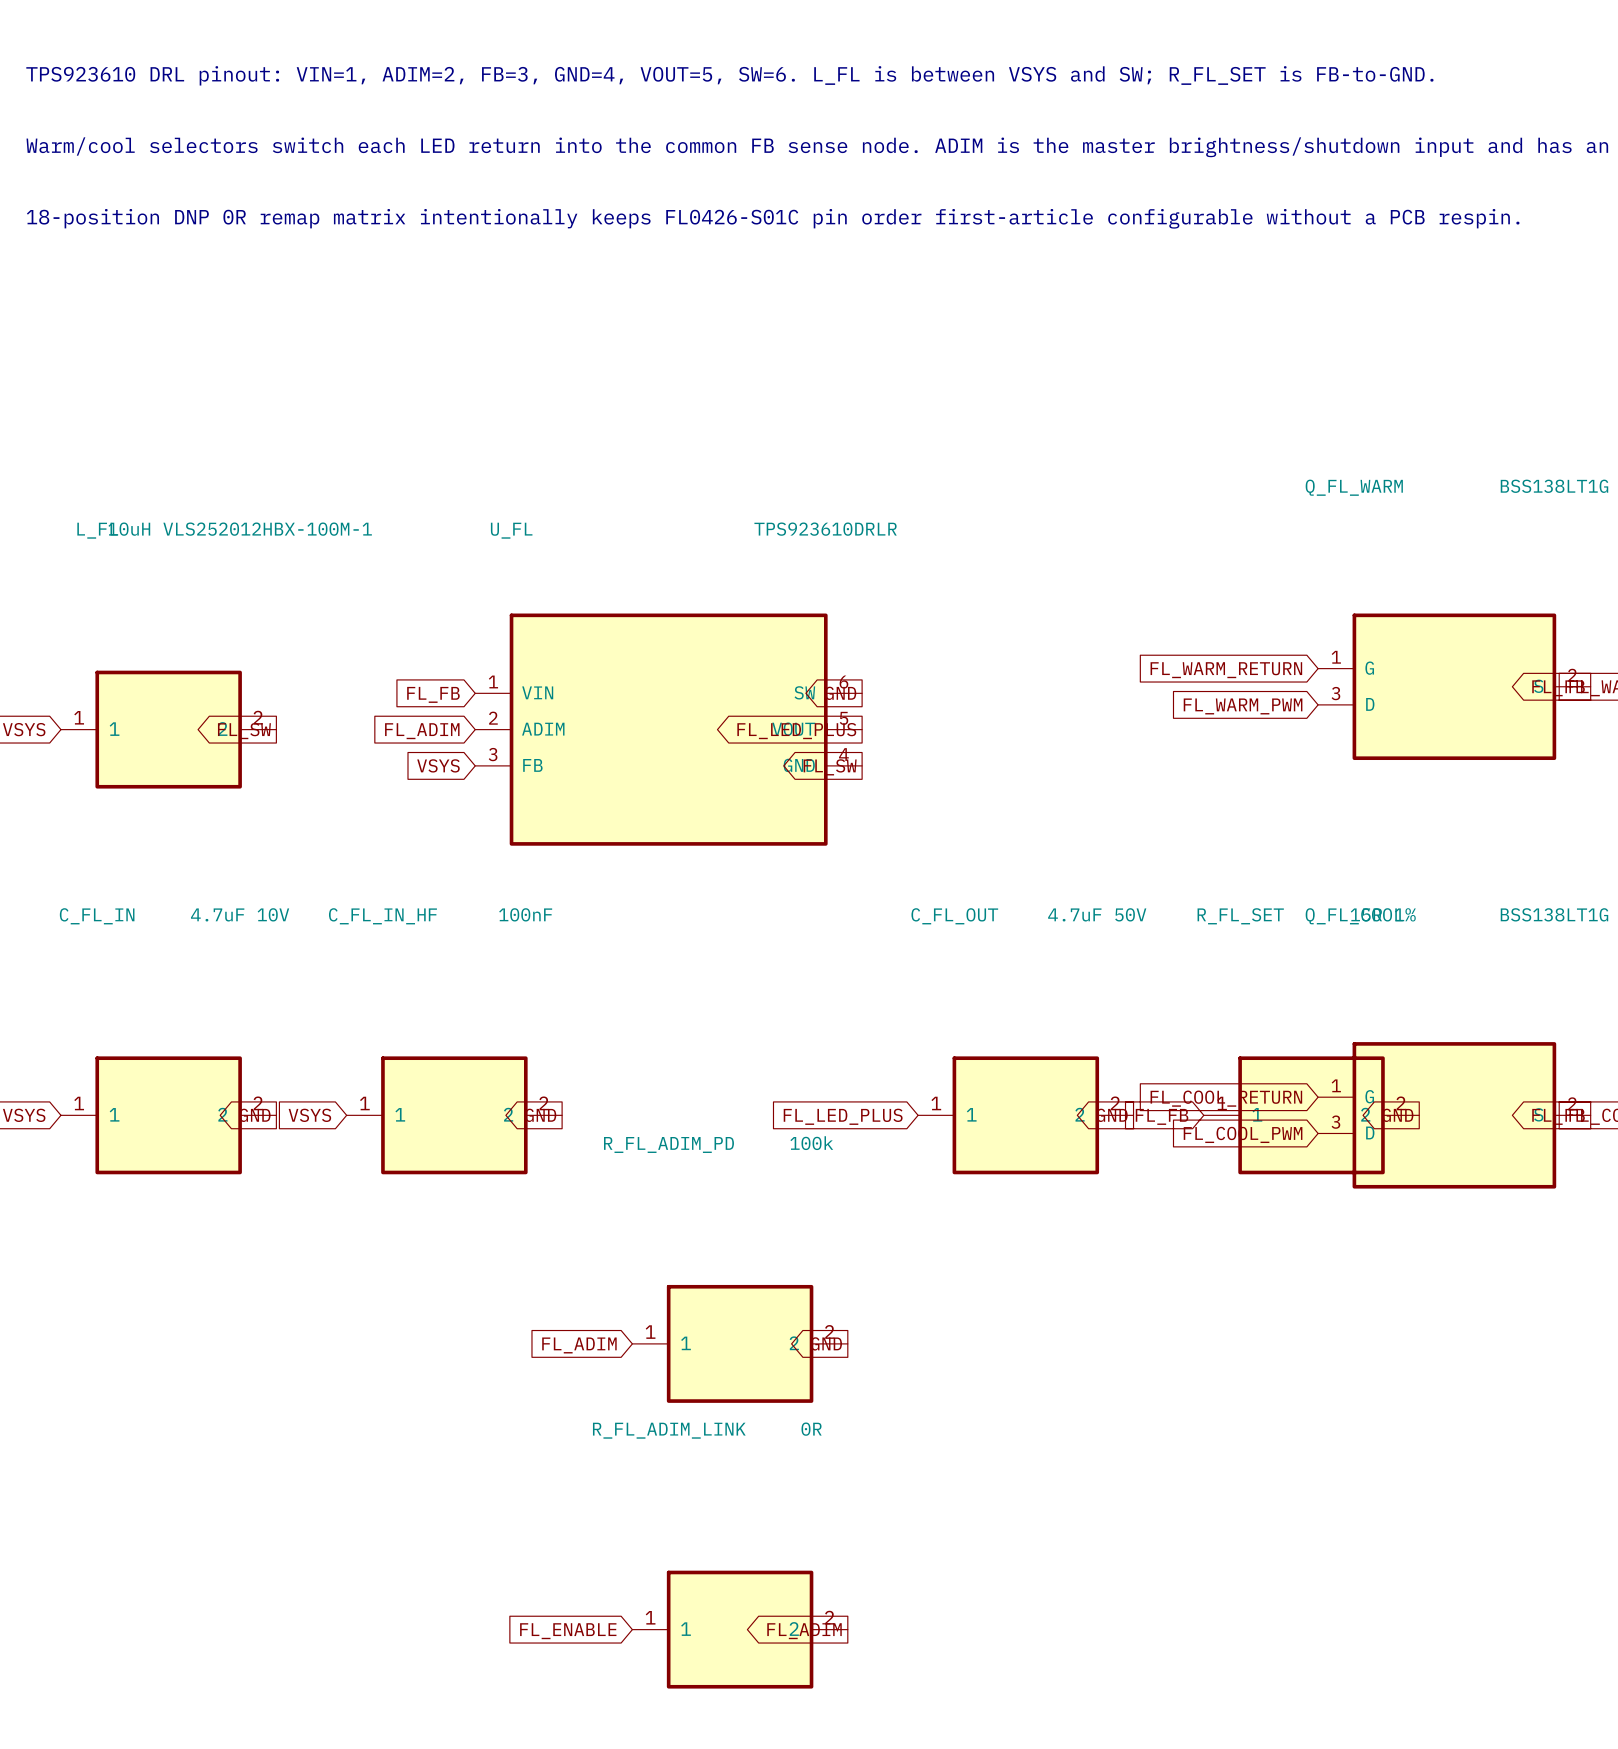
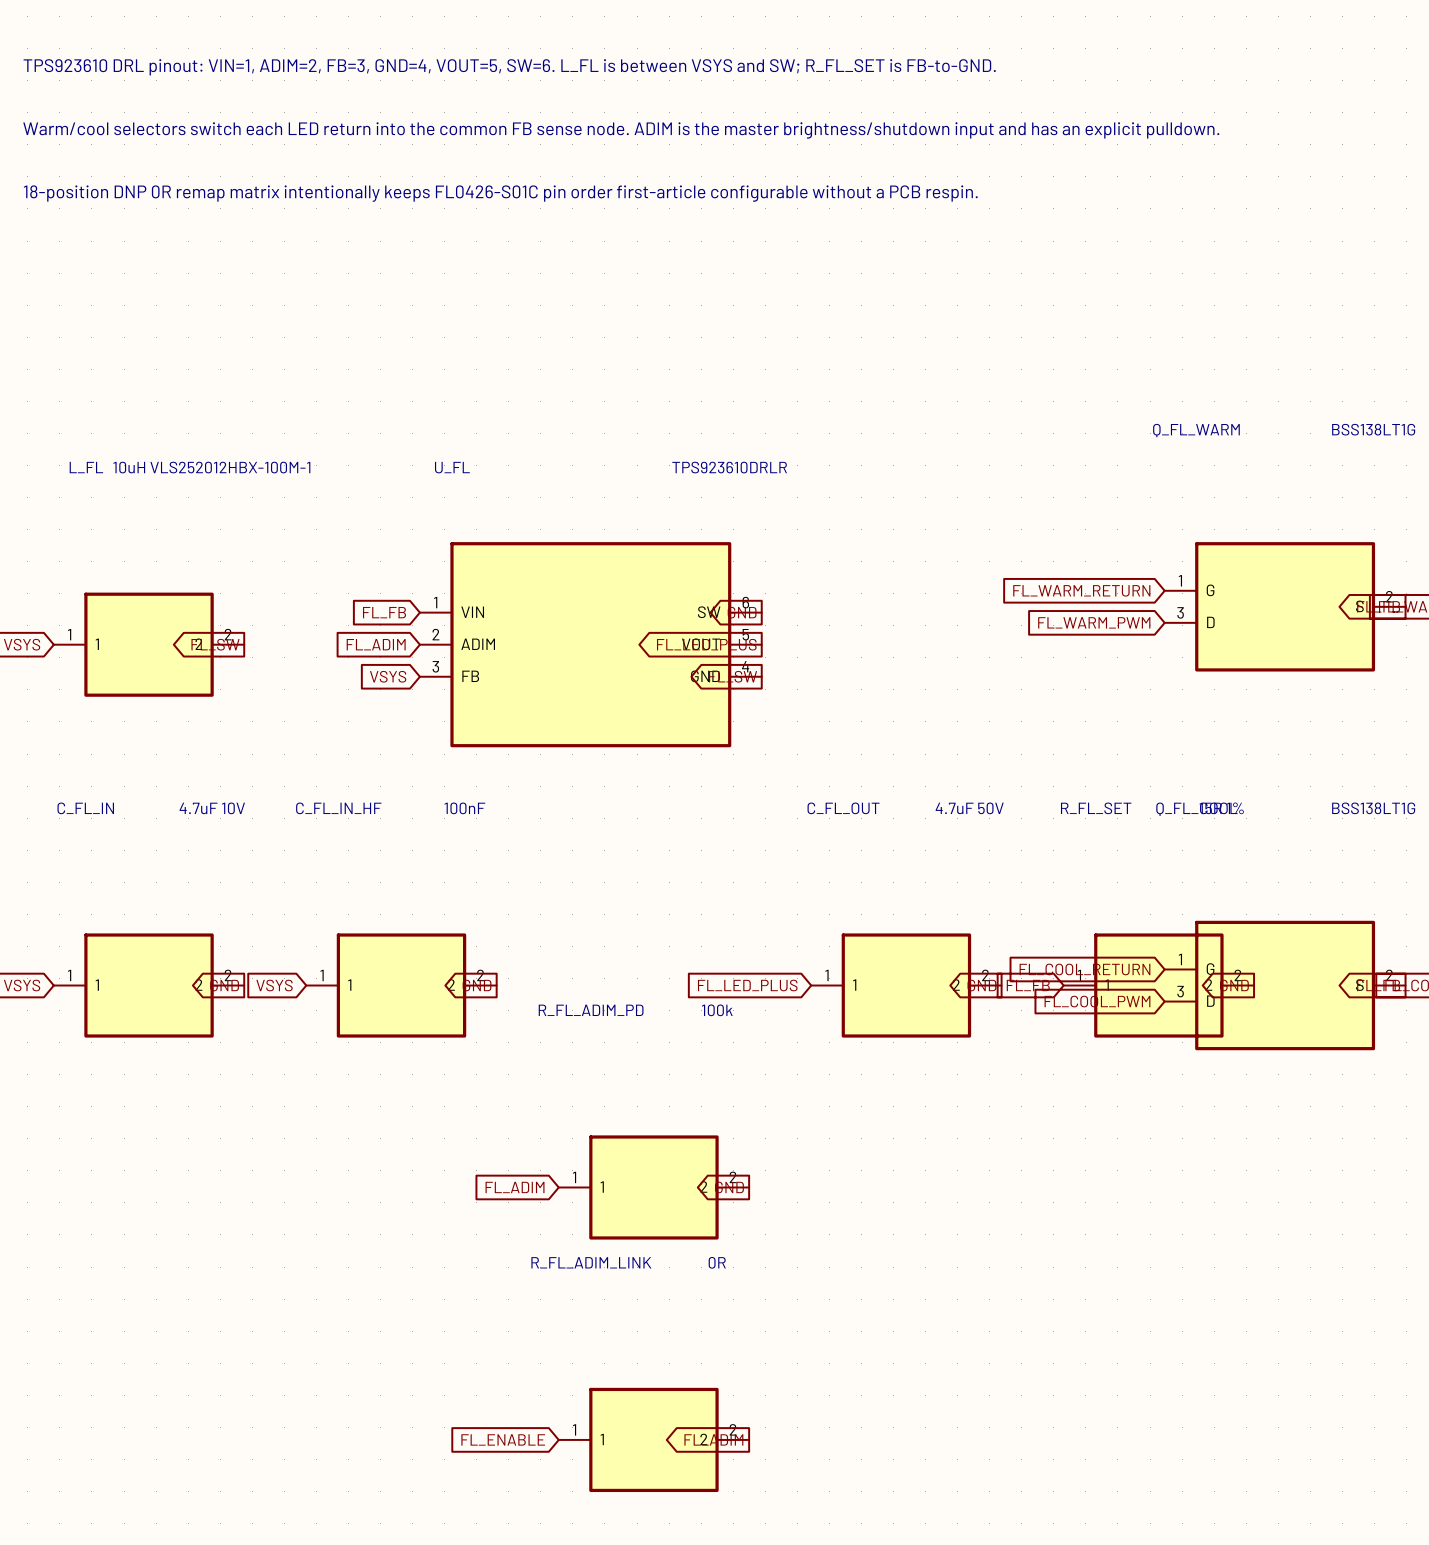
L_FL symbol: [60, 670, 277, 789] -> [53, 592, 245, 697]
C_FL_IN symbol: [60, 1056, 277, 1175] -> [53, 933, 245, 1038]
C_FL_IN_HF symbol: [346, 1056, 563, 1175] -> [306, 933, 497, 1038]
C_FL_OUT symbol: [918, 1056, 1134, 1175] -> [811, 933, 1002, 1038]
R_FL_SET symbol: [1203, 1056, 1420, 1175] -> [1063, 933, 1255, 1038]
R_FL_ADIM_PD symbol: [632, 1284, 848, 1403] -> [558, 1135, 750, 1240]
R_FL_ADIM_LINK symbol: [632, 1570, 848, 1689] -> [558, 1387, 750, 1493]

